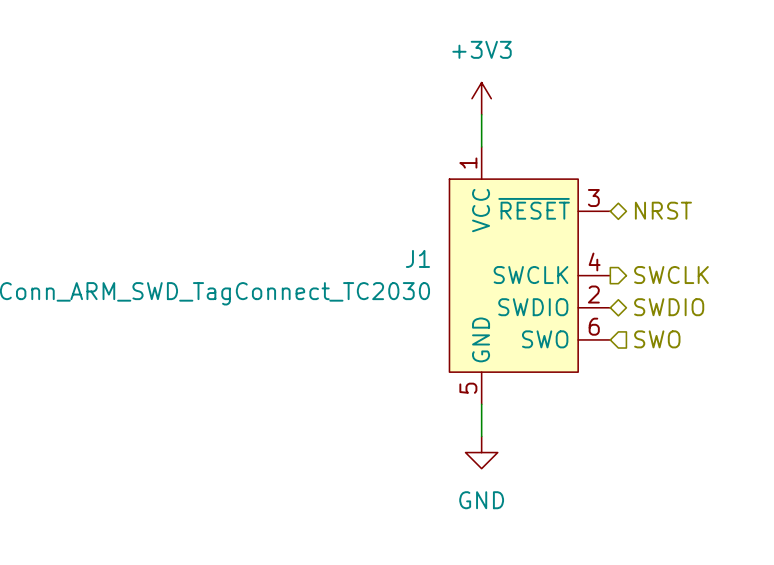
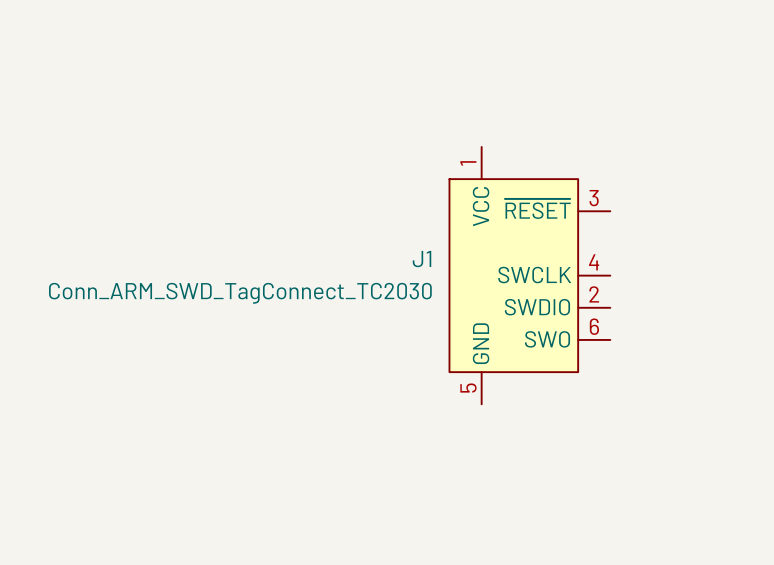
power symbol: +3V3 (481, 98) -> none
wire: (481, 114) (481, 146) -> none
hierarchical label: NRST (663, 210) -> none
hierarchical label: SWCLK (671, 275) -> none
hierarchical label: SWDIO (669, 307) -> none
hierarchical label: SWO (657, 339) -> none
wire: (481, 404) (481, 436) -> none
power symbol: GND (481, 452) -> none

